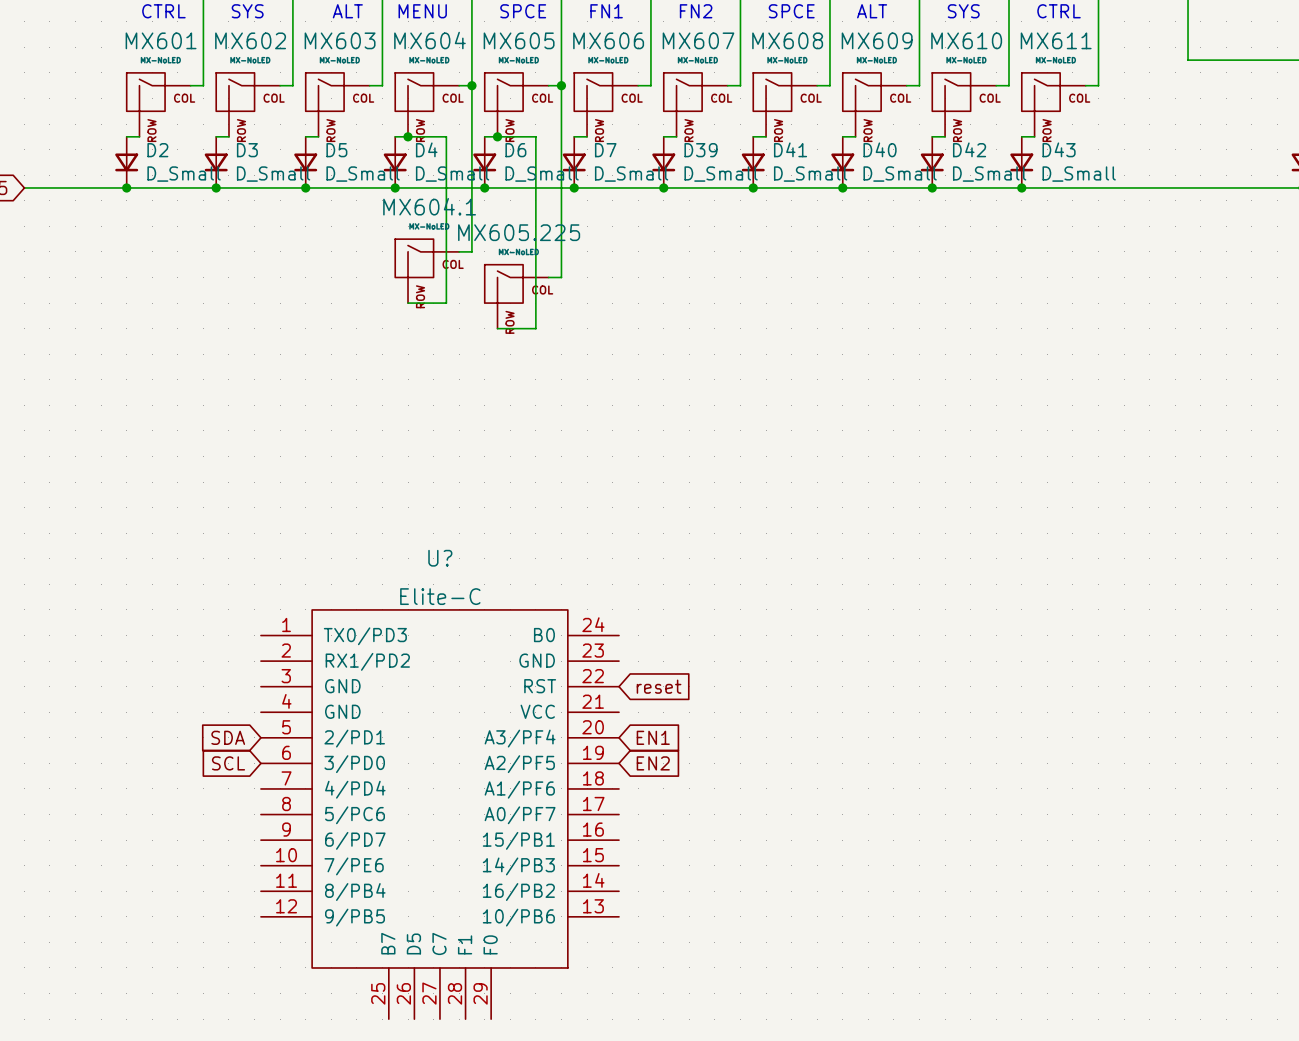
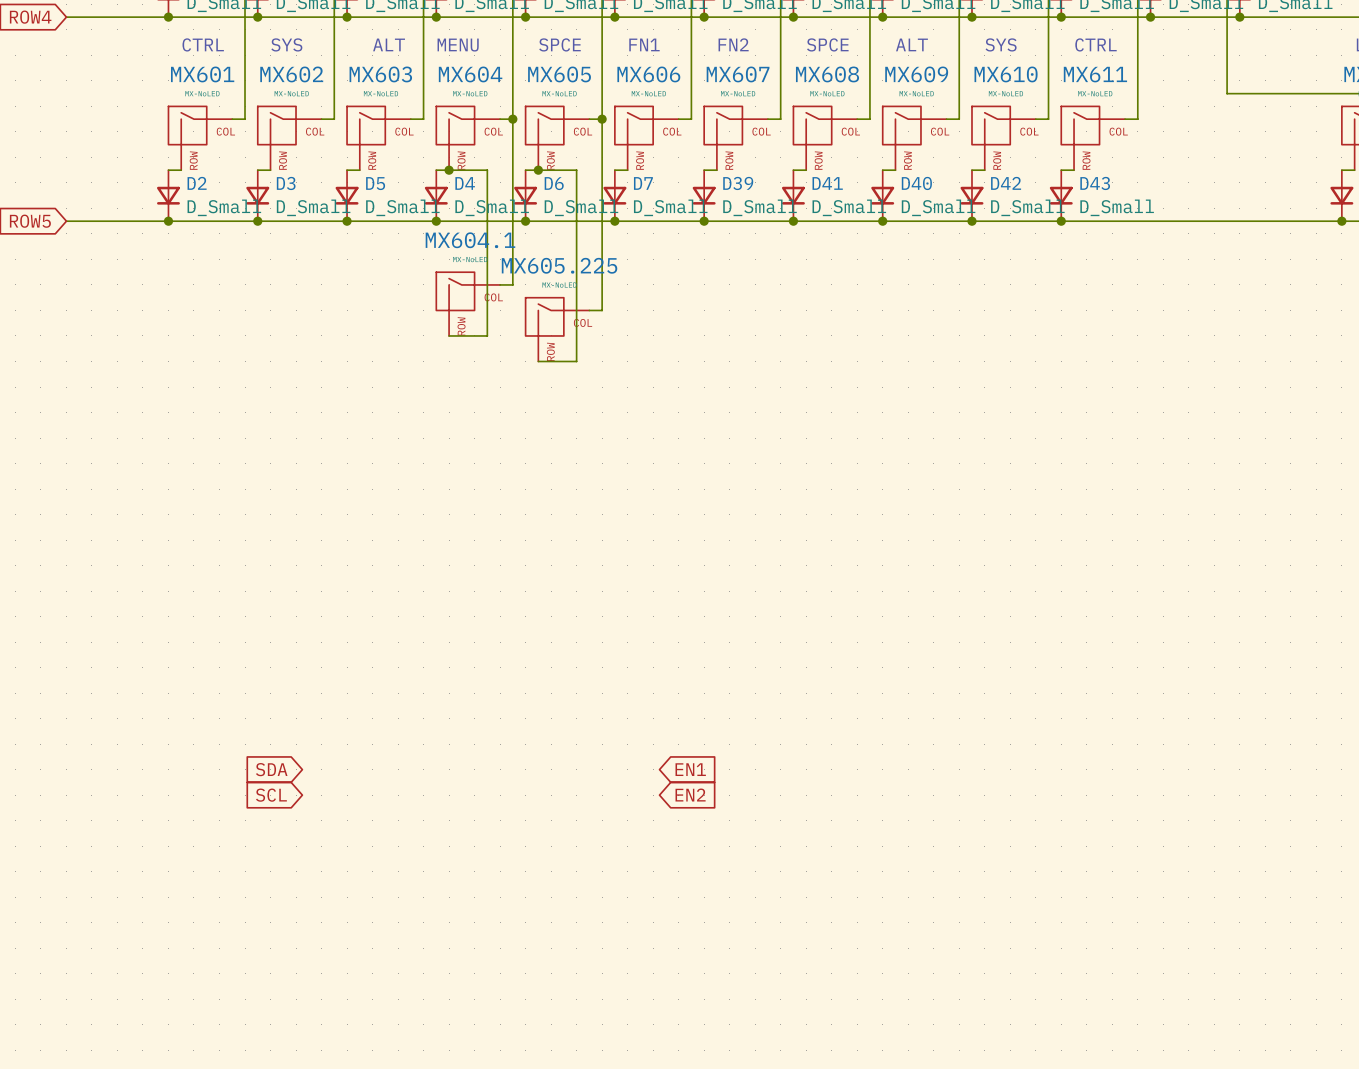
global label: reset (659, 686) -> none
U?: Elite-C (439, 814) -> none

